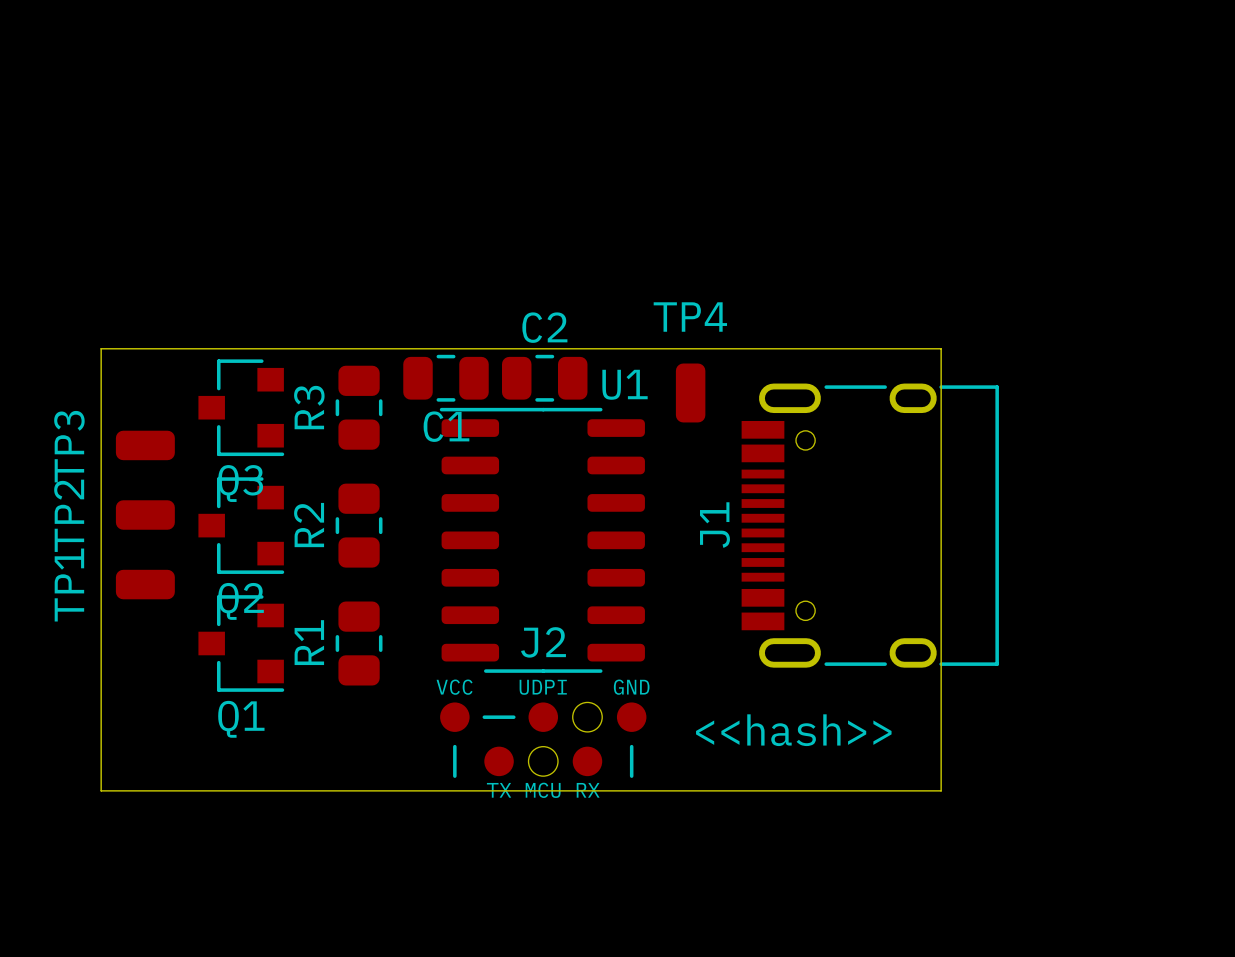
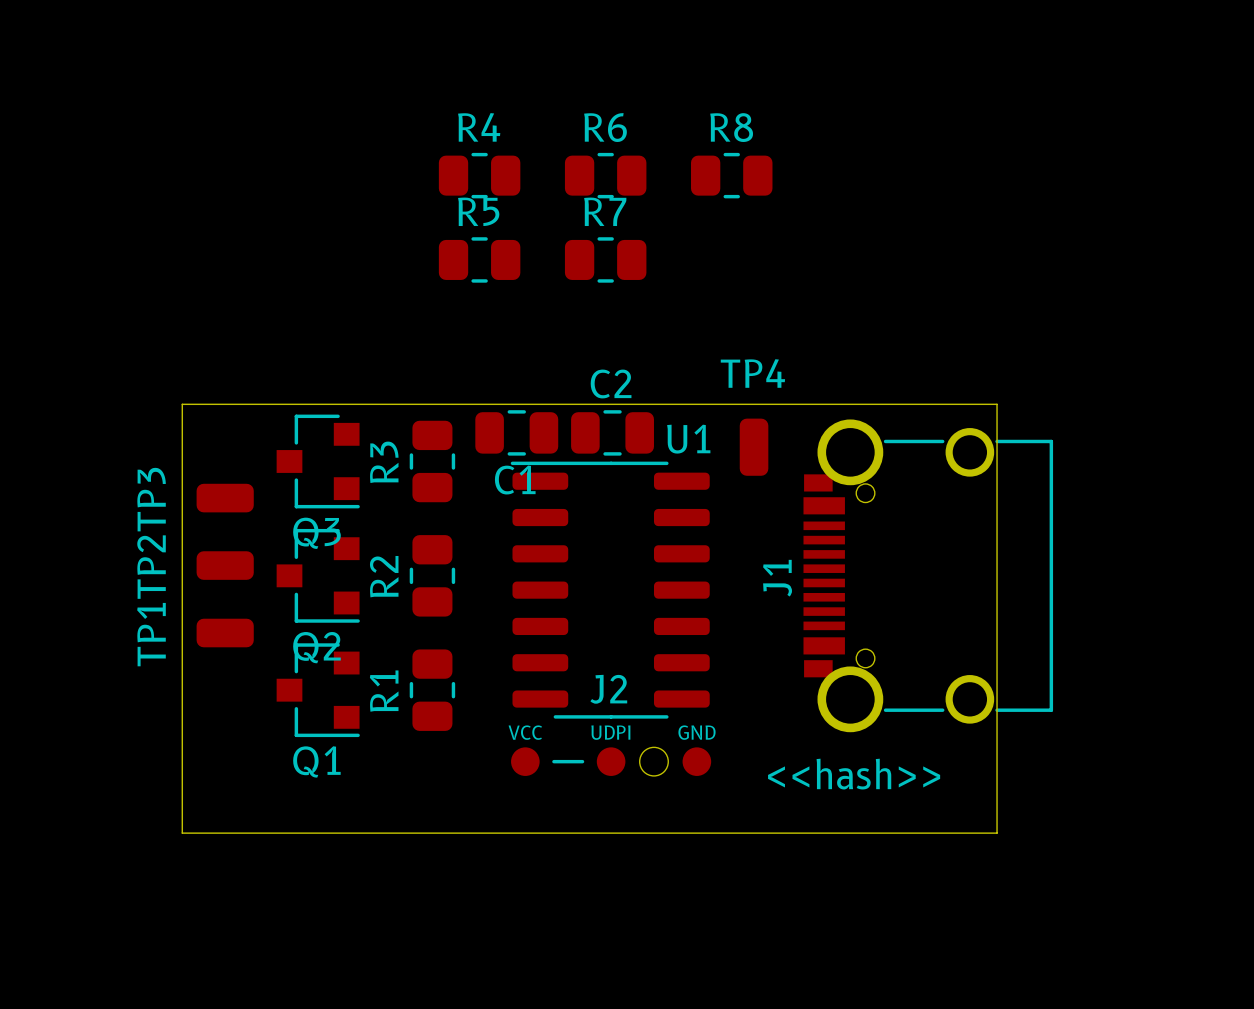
R4: none -> (479, 175)
R6: none -> (605, 175)
R8: none -> (731, 175)
R5: none -> (479, 259)
R7: none -> (605, 259)
J1 footprint: [741, 383, 999, 668] -> [803, 419, 1054, 733]
J2 footprint: [440, 702, 647, 778] -> [511, 747, 712, 776]

